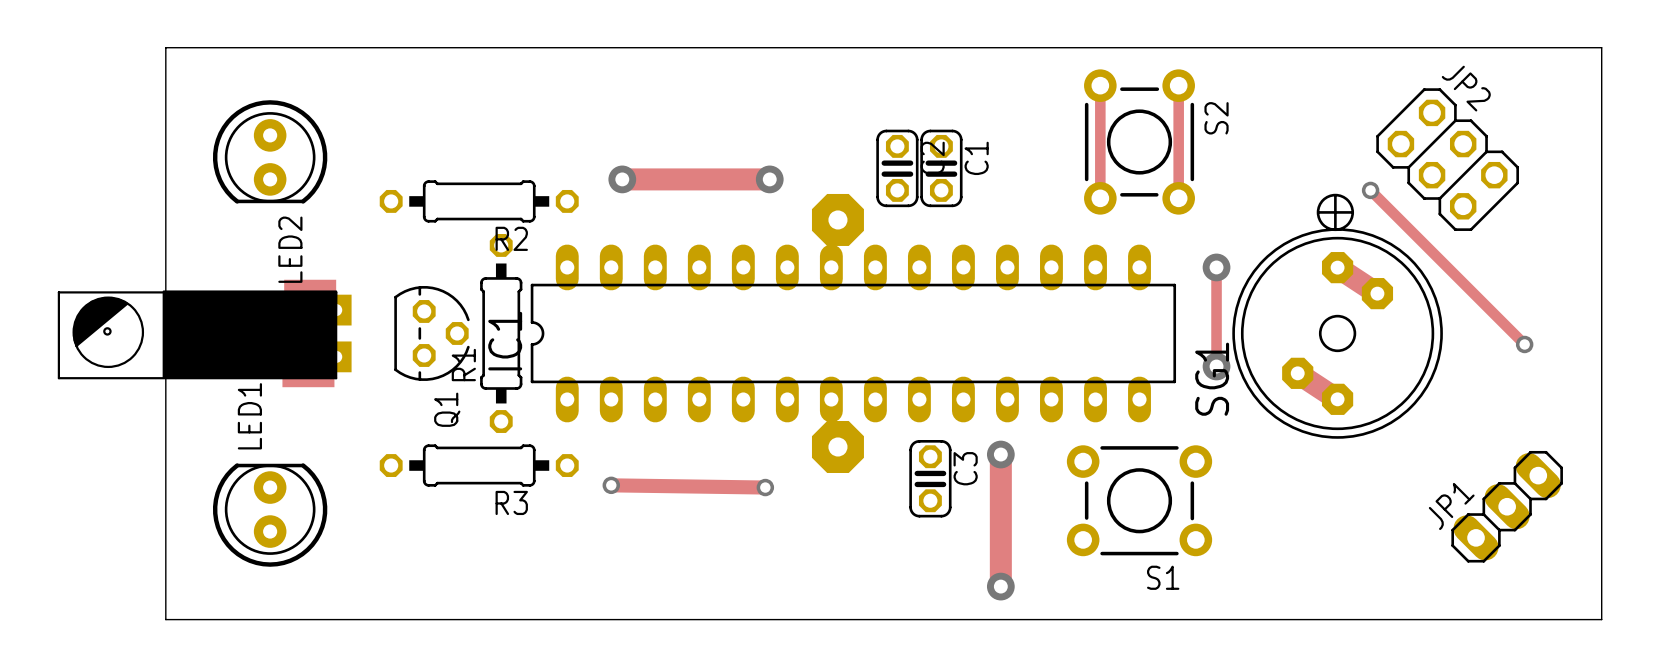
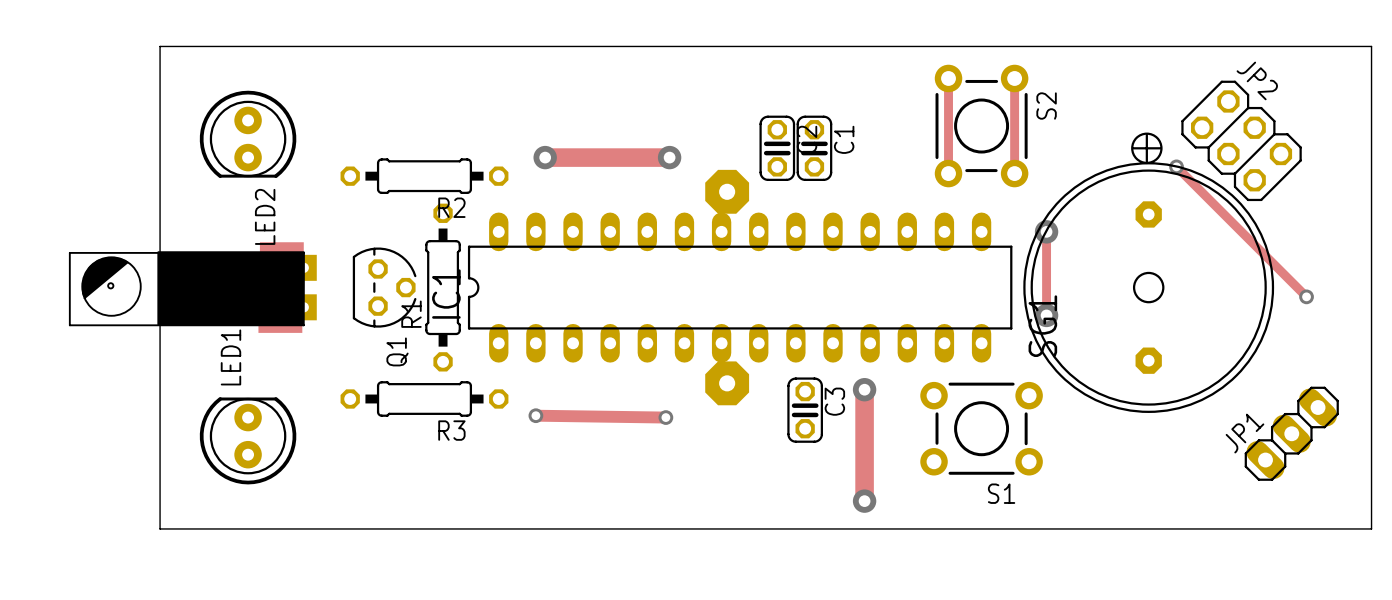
SG1 footprint: [1232, 193, 1443, 439] -> [1023, 132, 1275, 413]

